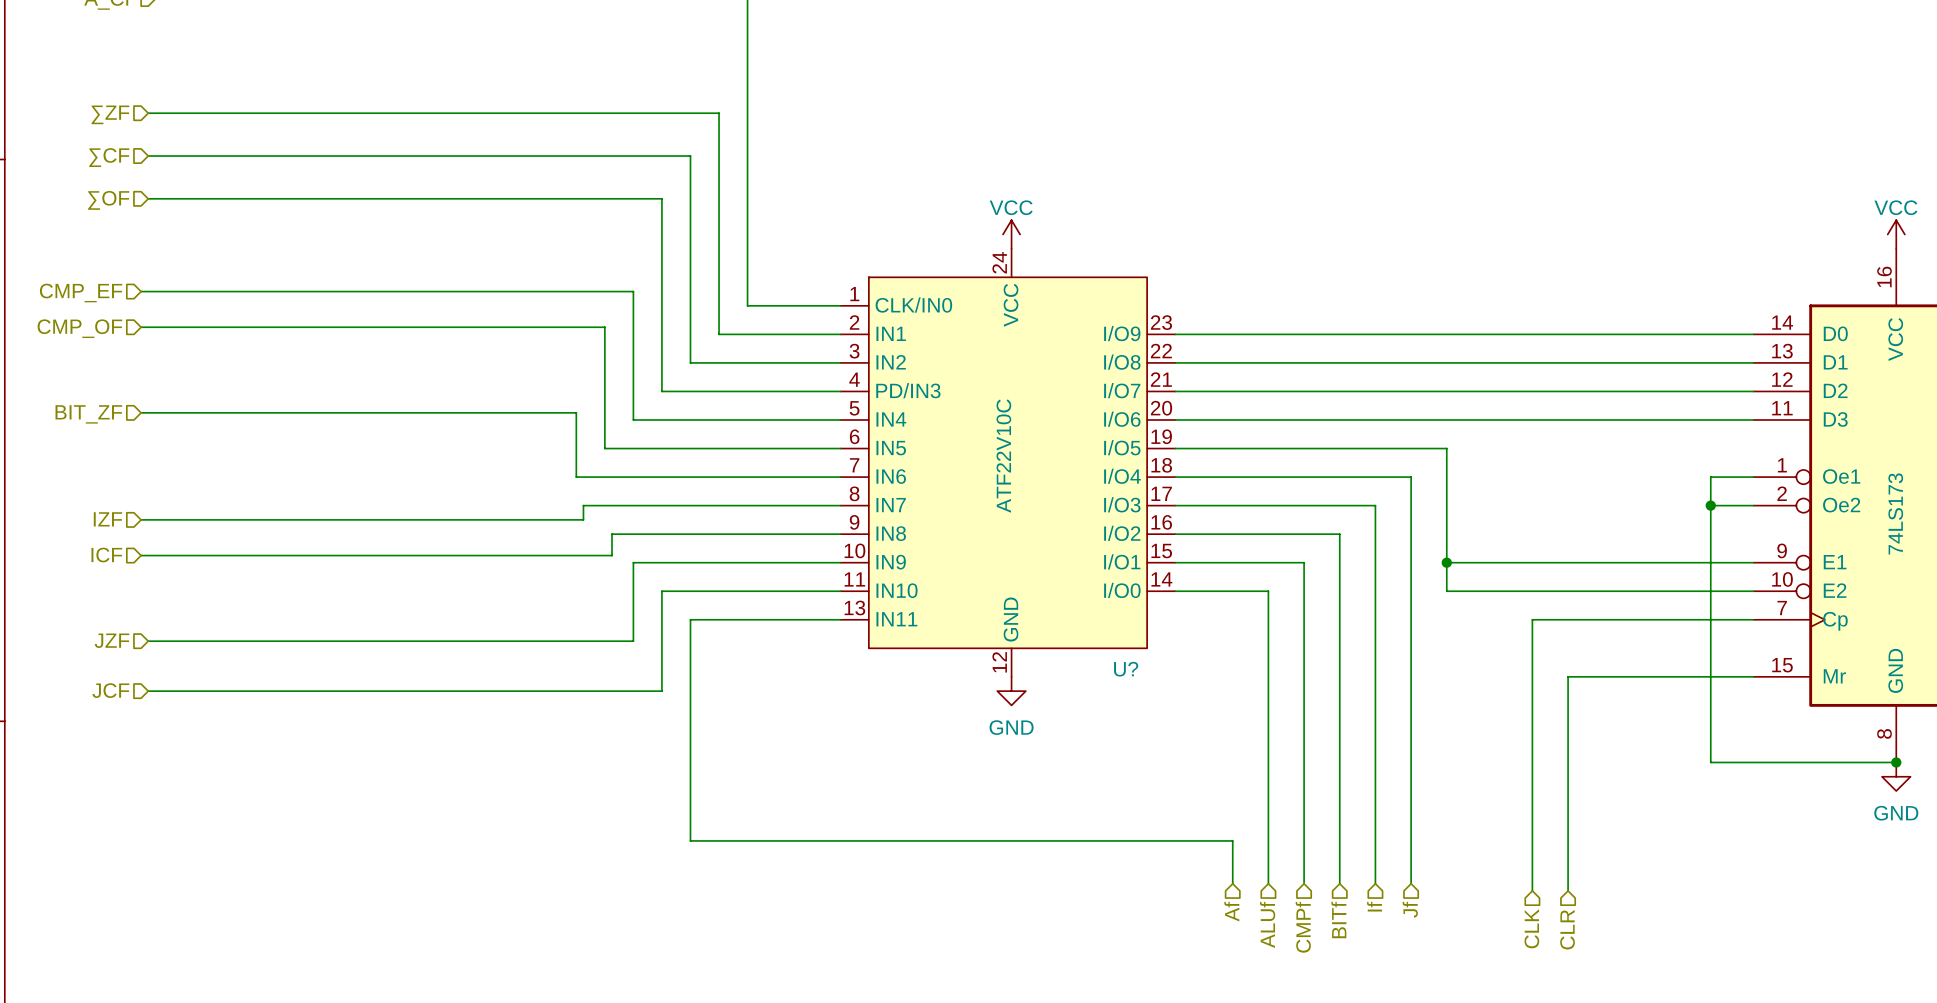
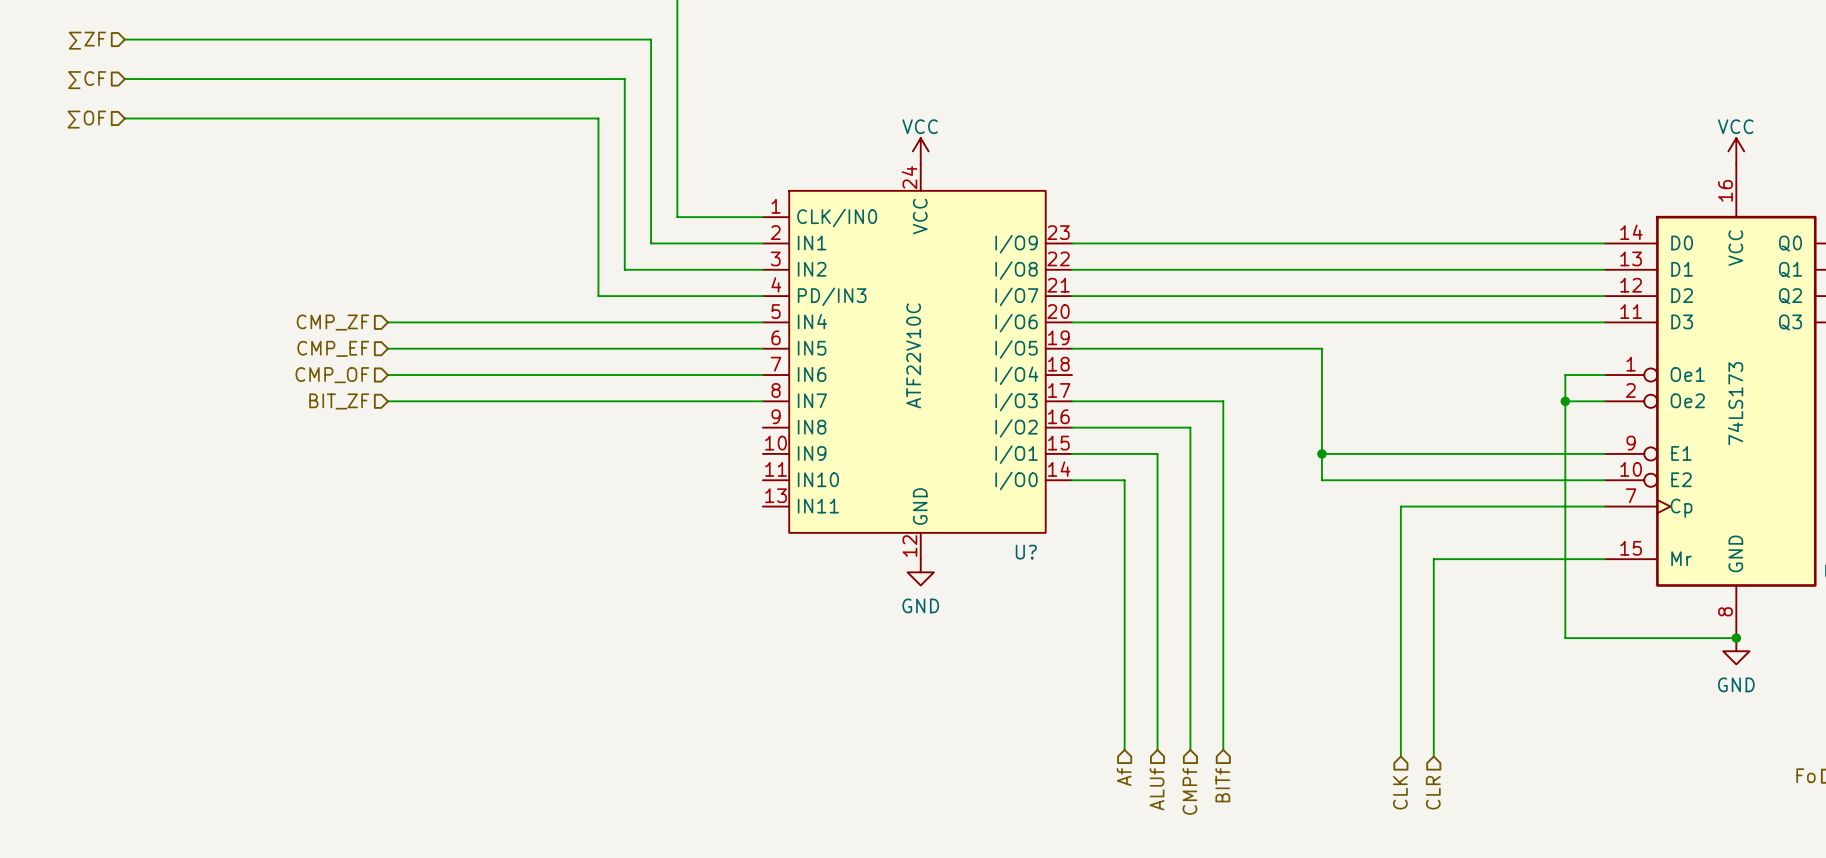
wire: (141, 291) (633, 291) (633, 420) -> (387, 322) (572, 322)
hierarchical label: CMP_EF (81, 292) -> none
wire: (141, 327) (604, 327) (604, 448) -> (387, 348) (545, 348)
hierarchical label: CMP_OF (79, 328) -> none
wire: (141, 412) (576, 412) (576, 477) -> (387, 375) (519, 375)
hierarchical label: BIT_ZF (88, 414) -> none
hierarchical label: none -> CMP_ZF (332, 322)
hierarchical label: none -> CMP_EF (333, 348)
wire: (1175, 477) (1411, 477) (1411, 883) -> none
hierarchical label: none -> CMP_OF (332, 375)
wire: (583, 505) (583, 519) (141, 519) -> (526, 401) (387, 401)
wire: (1339, 505) (1375, 505) (1375, 883) -> none
hierarchical label: none -> BIT_ZF (339, 401)
hierarchical label: IZF (107, 519) -> none
wire: (840, 534) (612, 534) (612, 555) (141, 555) -> none
wire: (1304, 534) (1339, 534) -> (1223, 401) (1223, 427)
hierarchical label: ICF (106, 555) -> none
wire: (840, 562) (633, 562) (633, 641) (148, 641) -> none
wire: (1268, 562) (1304, 562) -> (1190, 427) (1190, 453)
wire: (840, 591) (661, 591) (661, 691) (148, 691) -> none
wire: (1232, 591) (1268, 591) -> (1157, 453) (1157, 480)
wire: (840, 619) (690, 619) (690, 840) (1232, 840) -> (1124, 480) (1124, 710)
hierarchical label: JZF (112, 640) -> none
hierarchical label: JCF (110, 690) -> none
hierarchical label: If (1374, 906) -> none
hierarchical label: Jf (1410, 909) -> none

